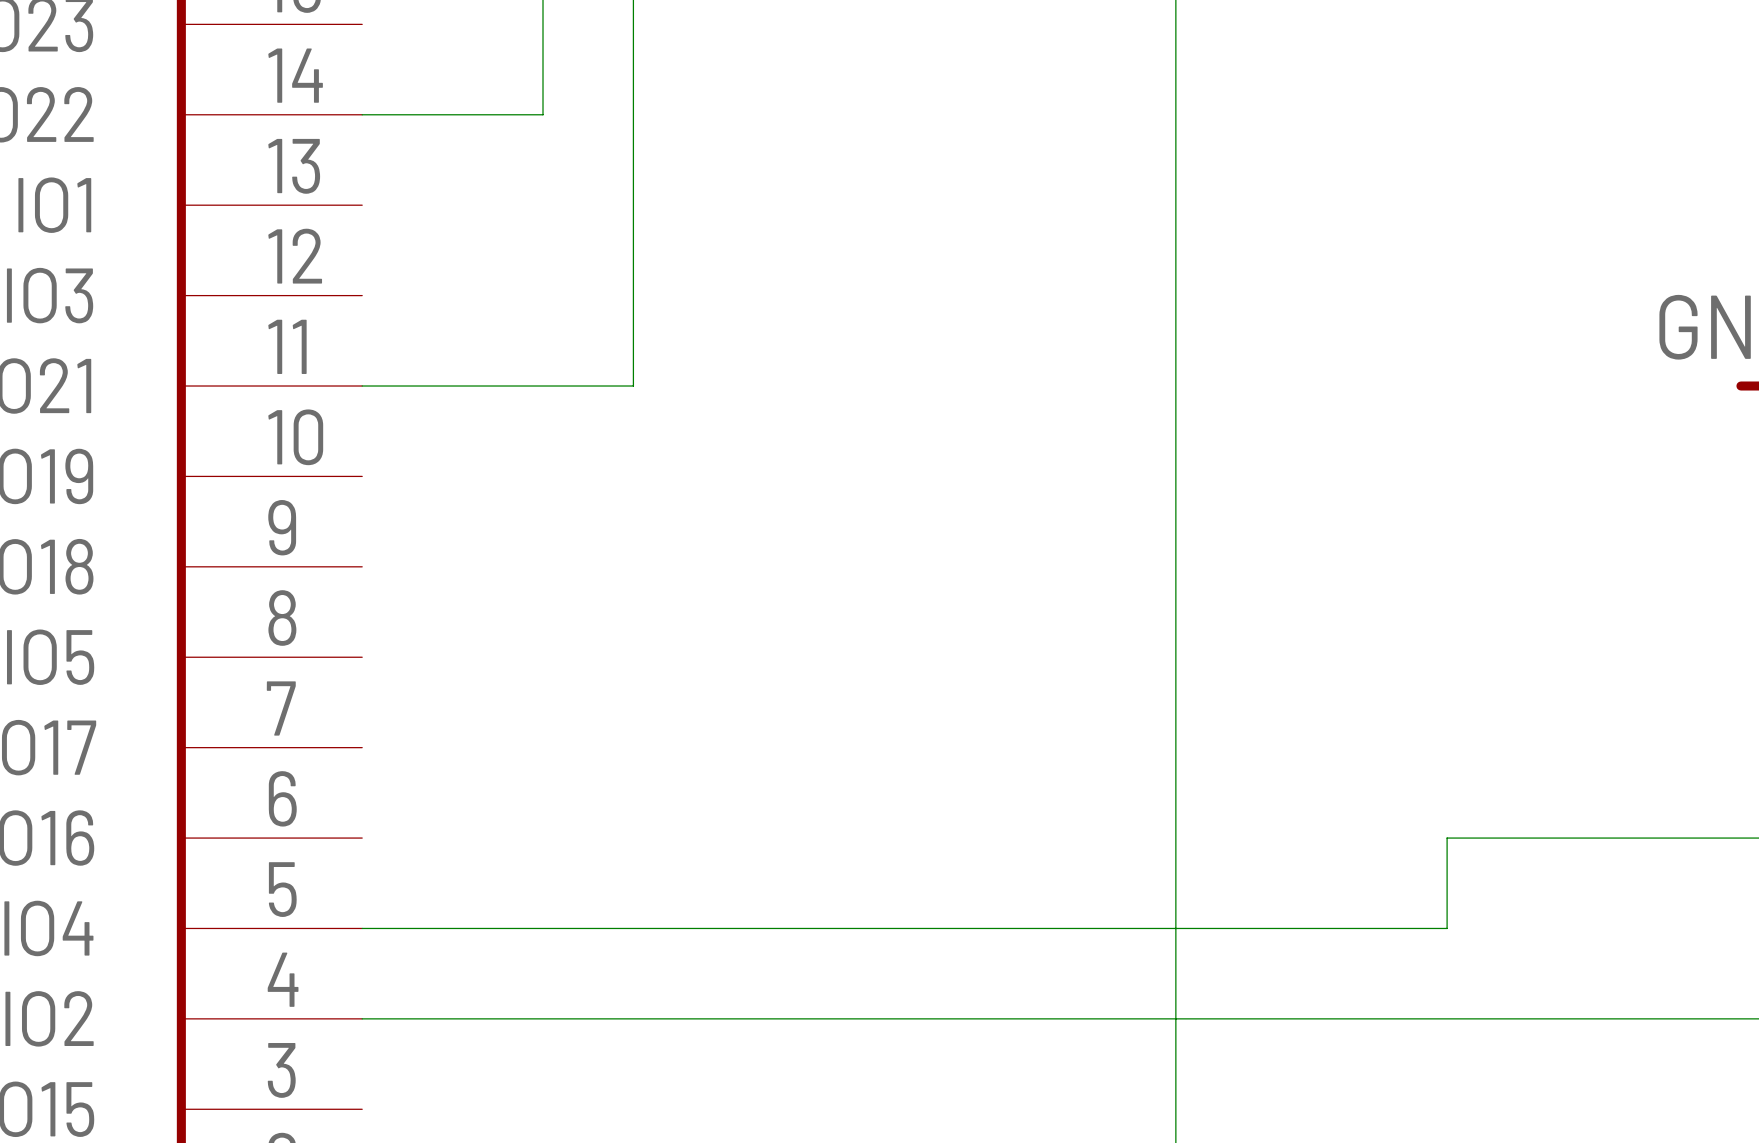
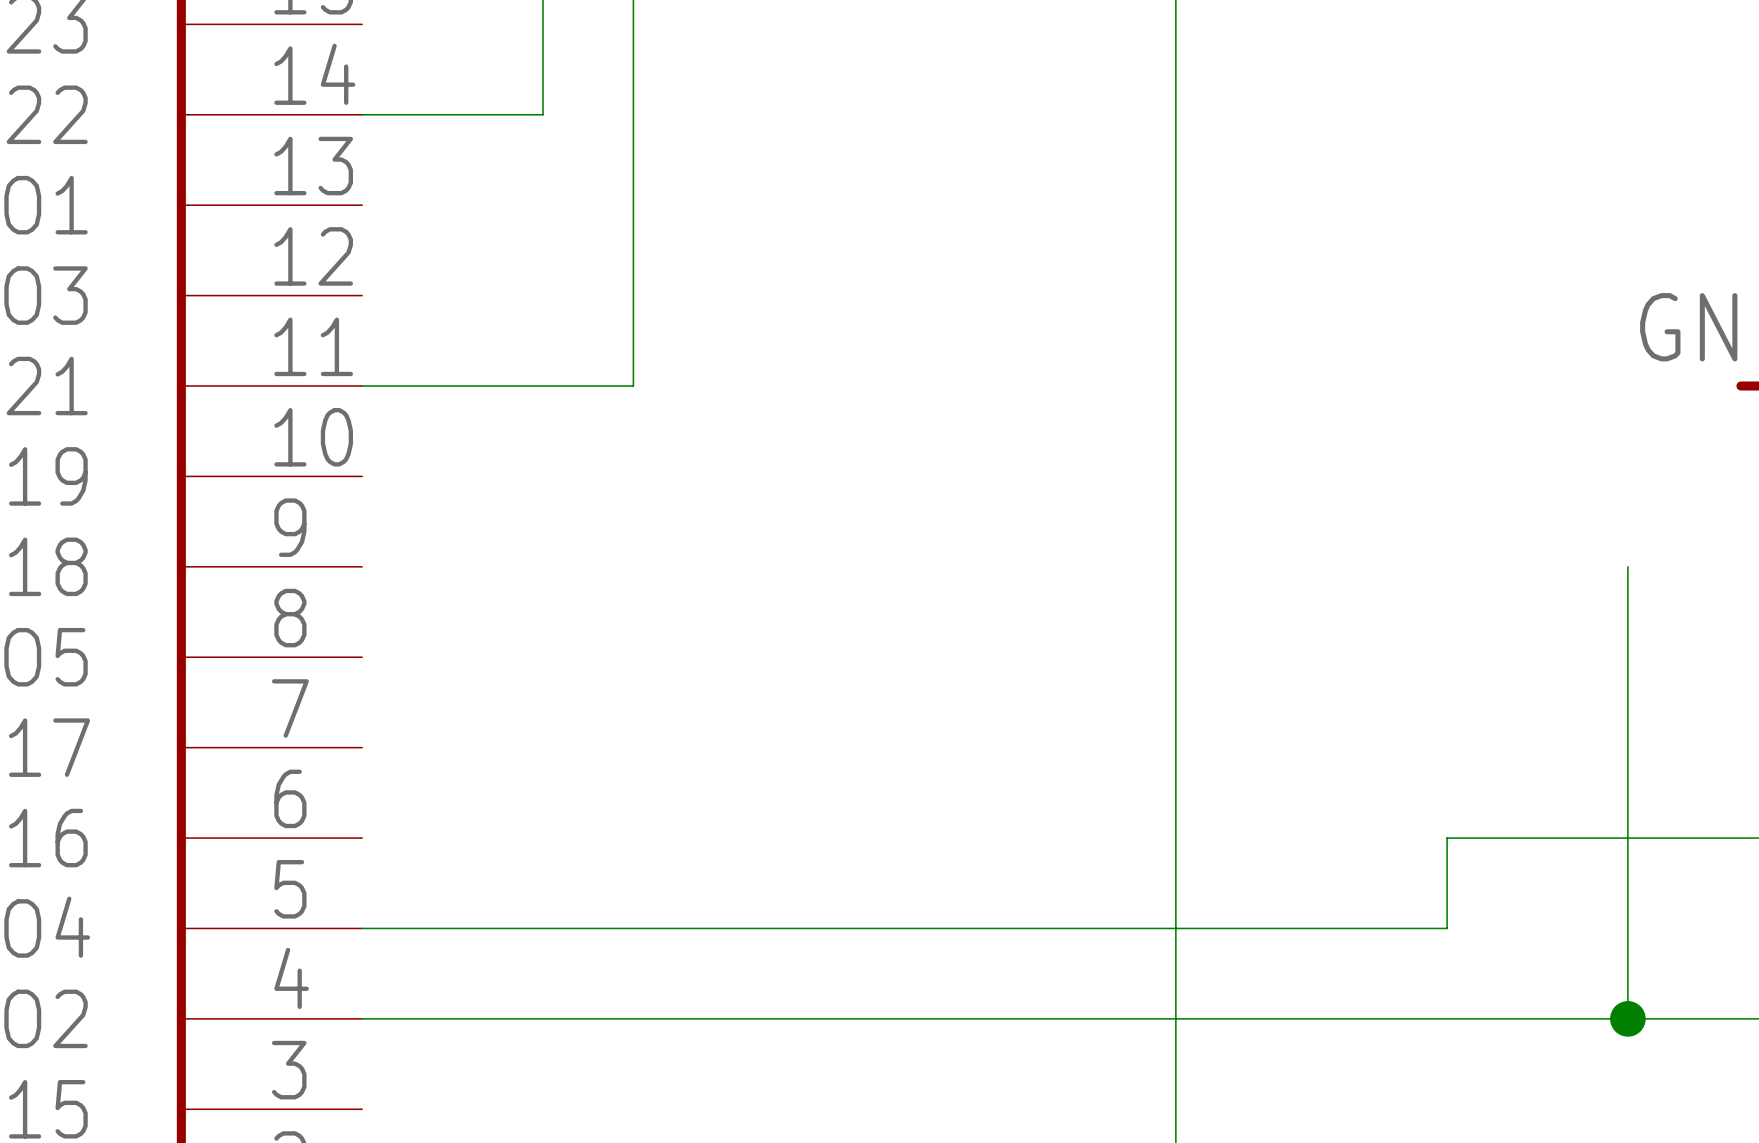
wire: none -> (1627, 566) (1627, 1018)
junction: none -> (1627, 1018)

